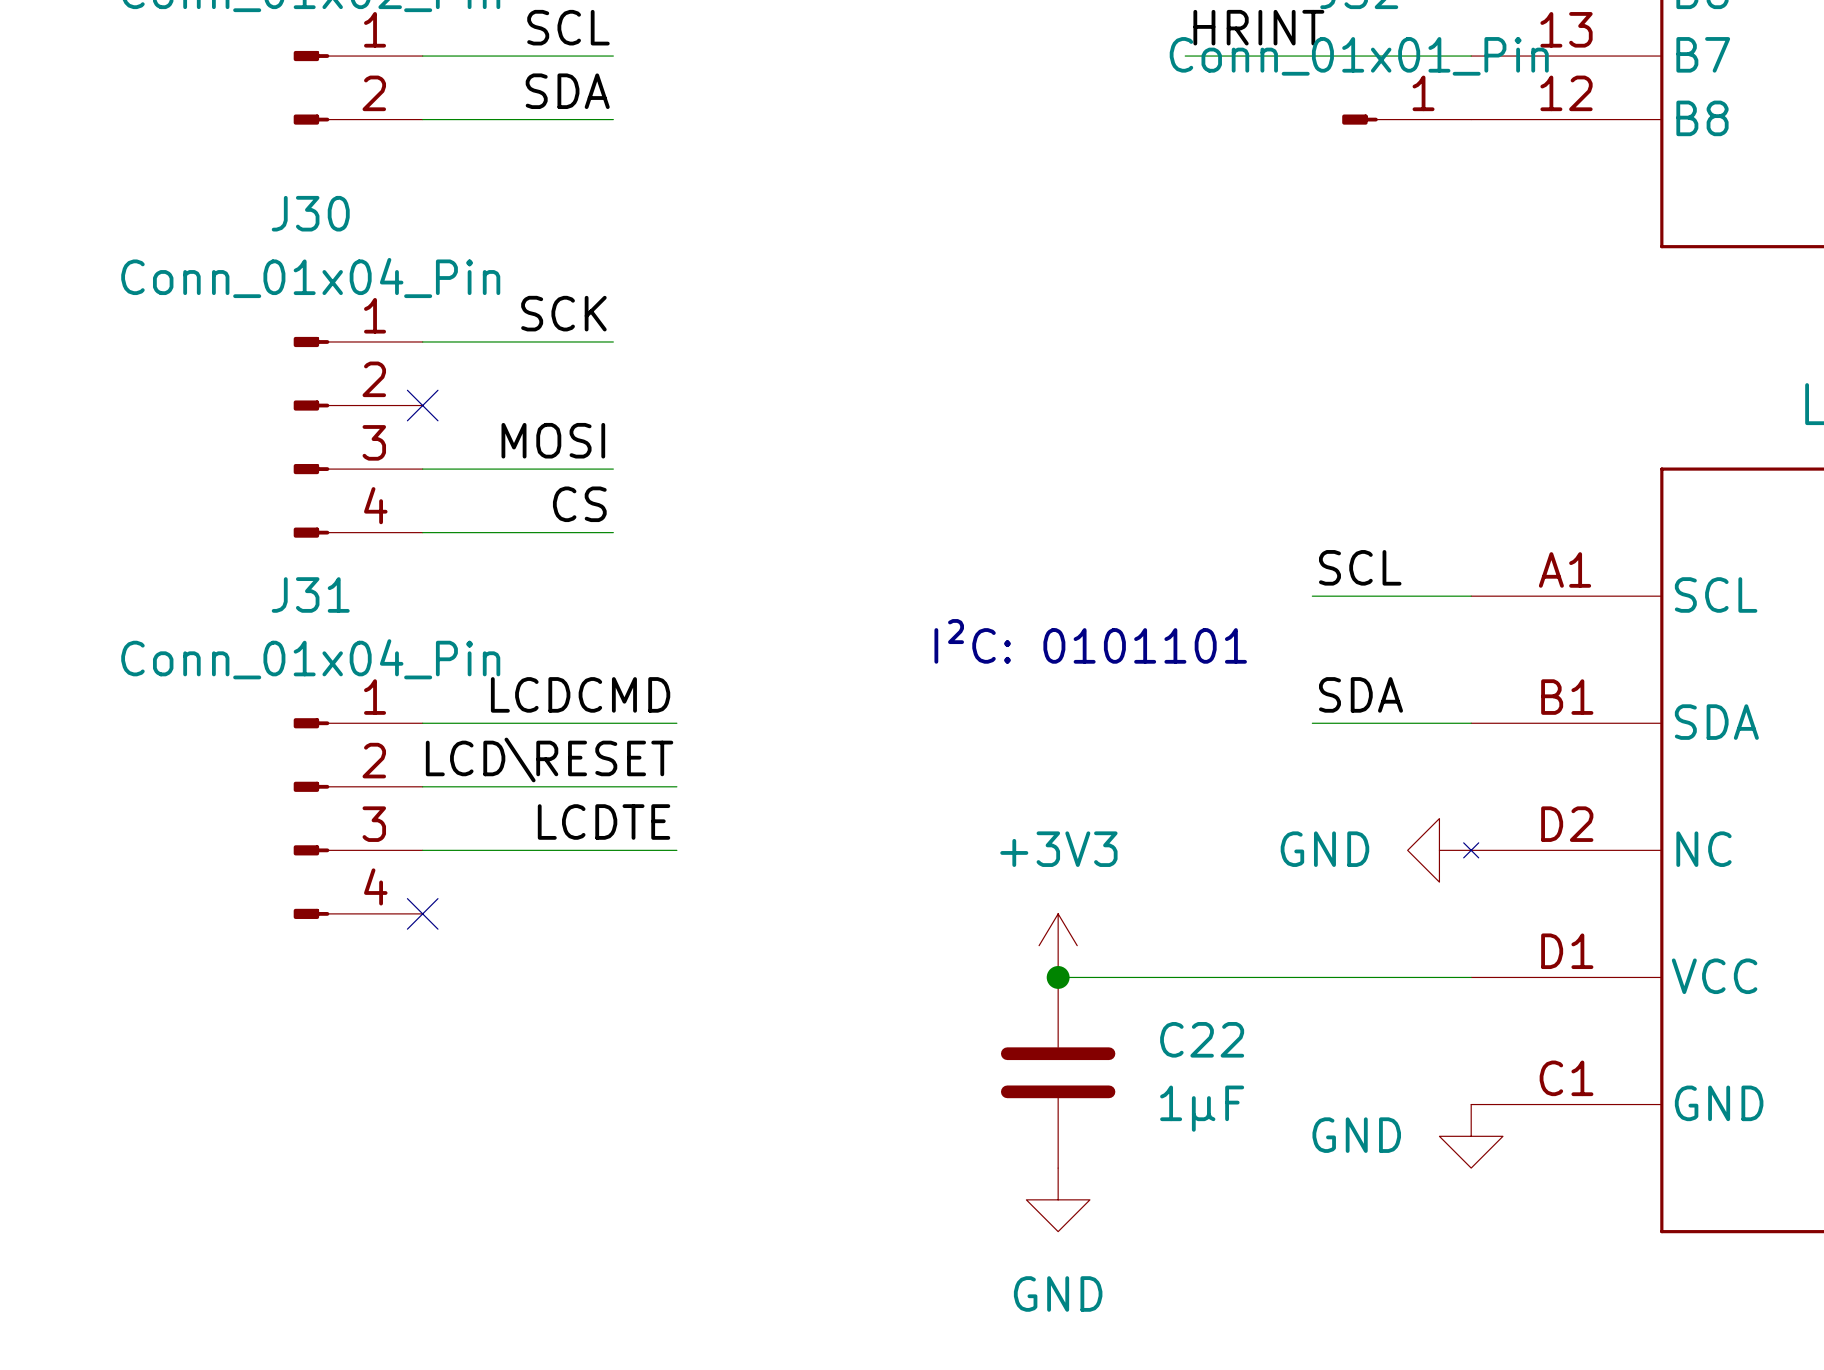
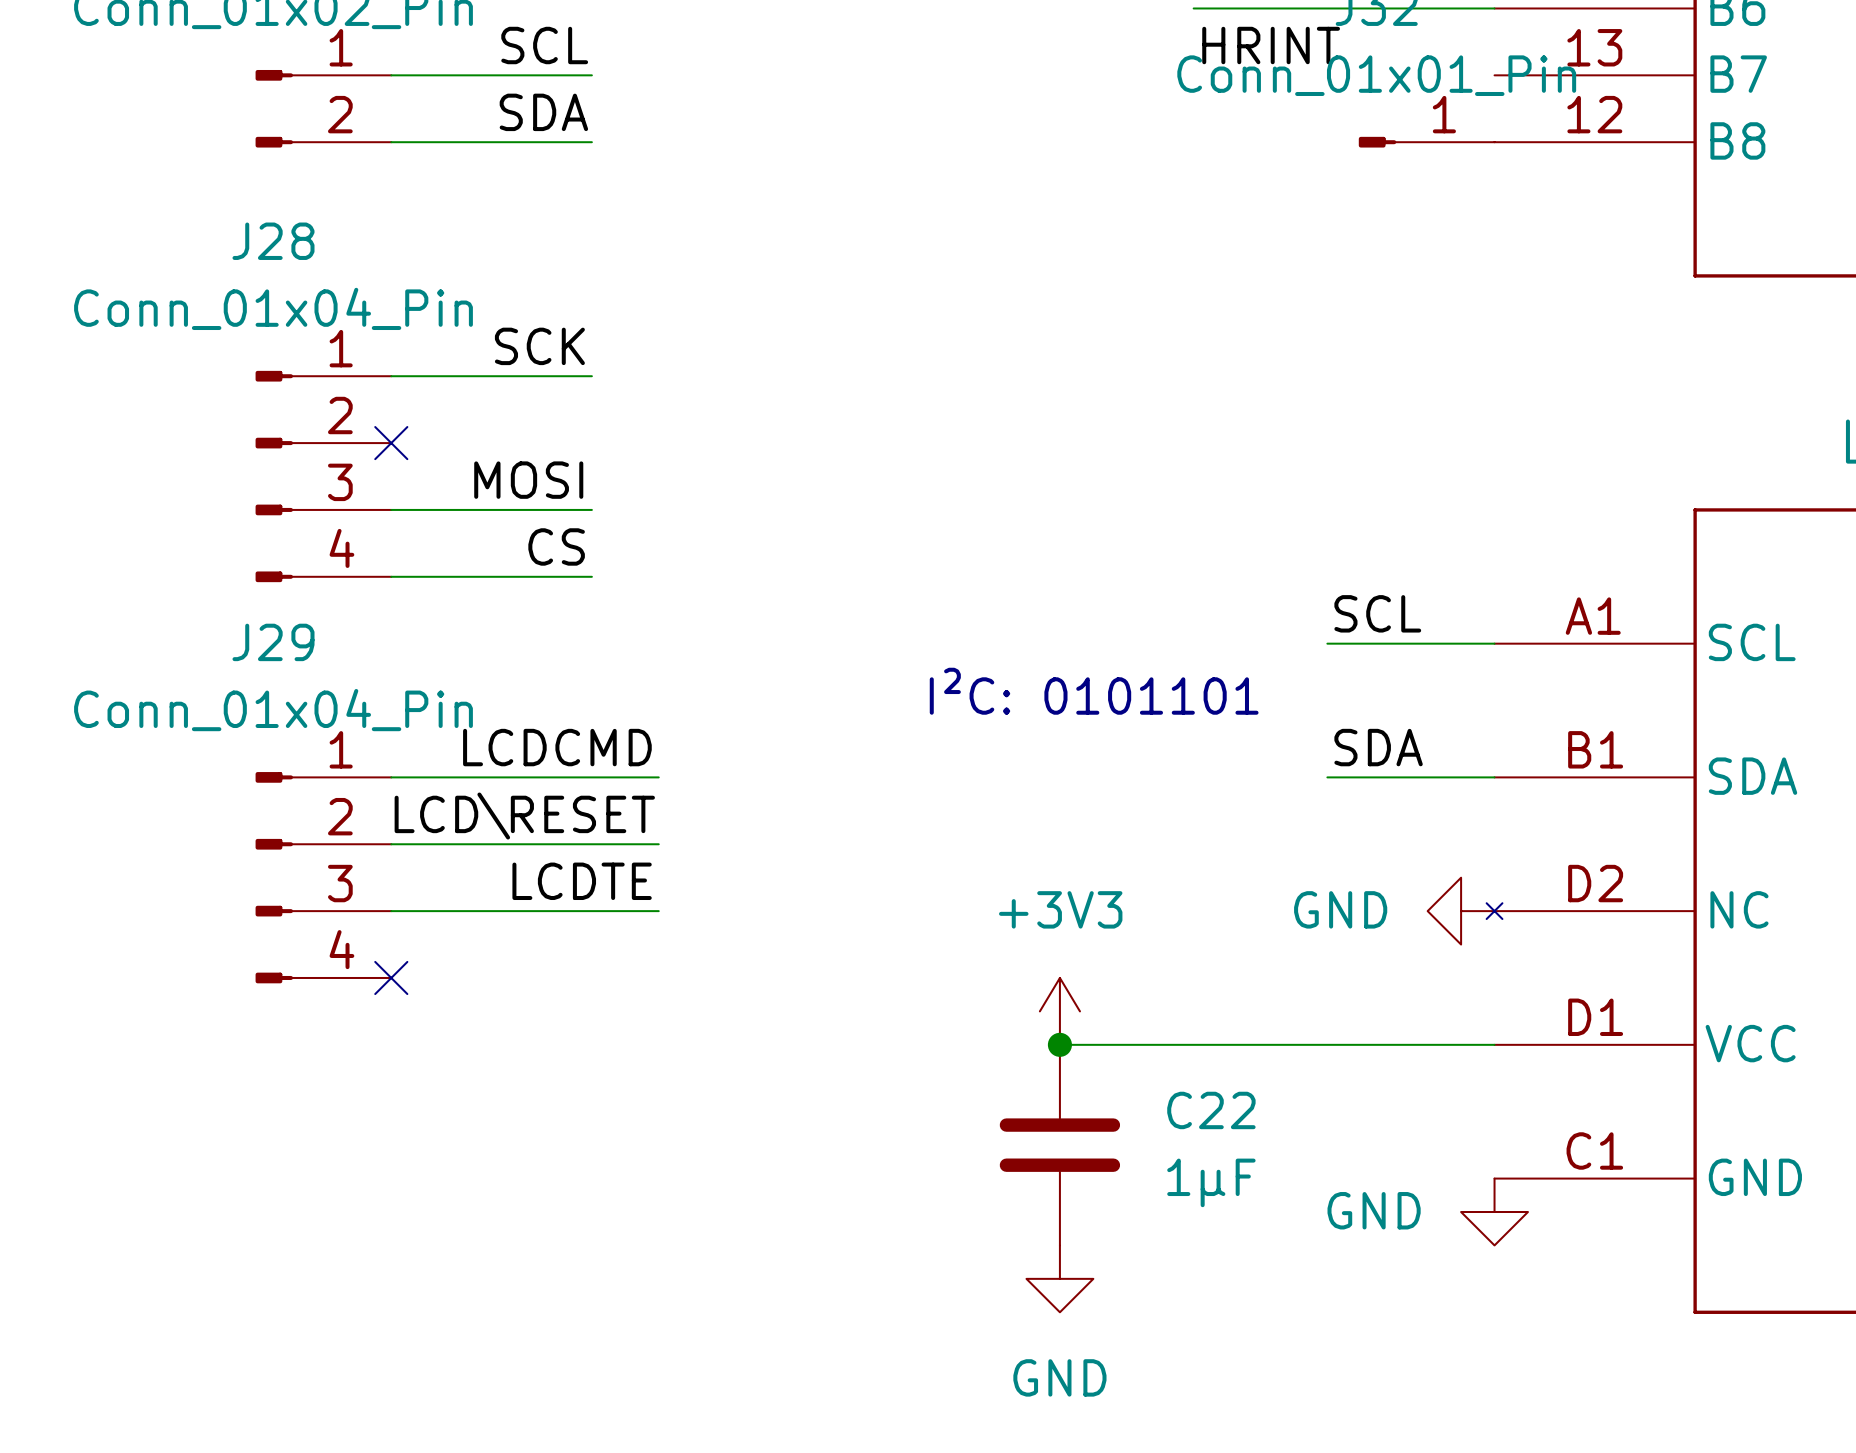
wire: (1185, 56) (1471, 56) -> none
J30 name: J30 (310, 213) -> J28 (273, 241)
J31 name: J31 (310, 594) -> J29 (273, 642)

